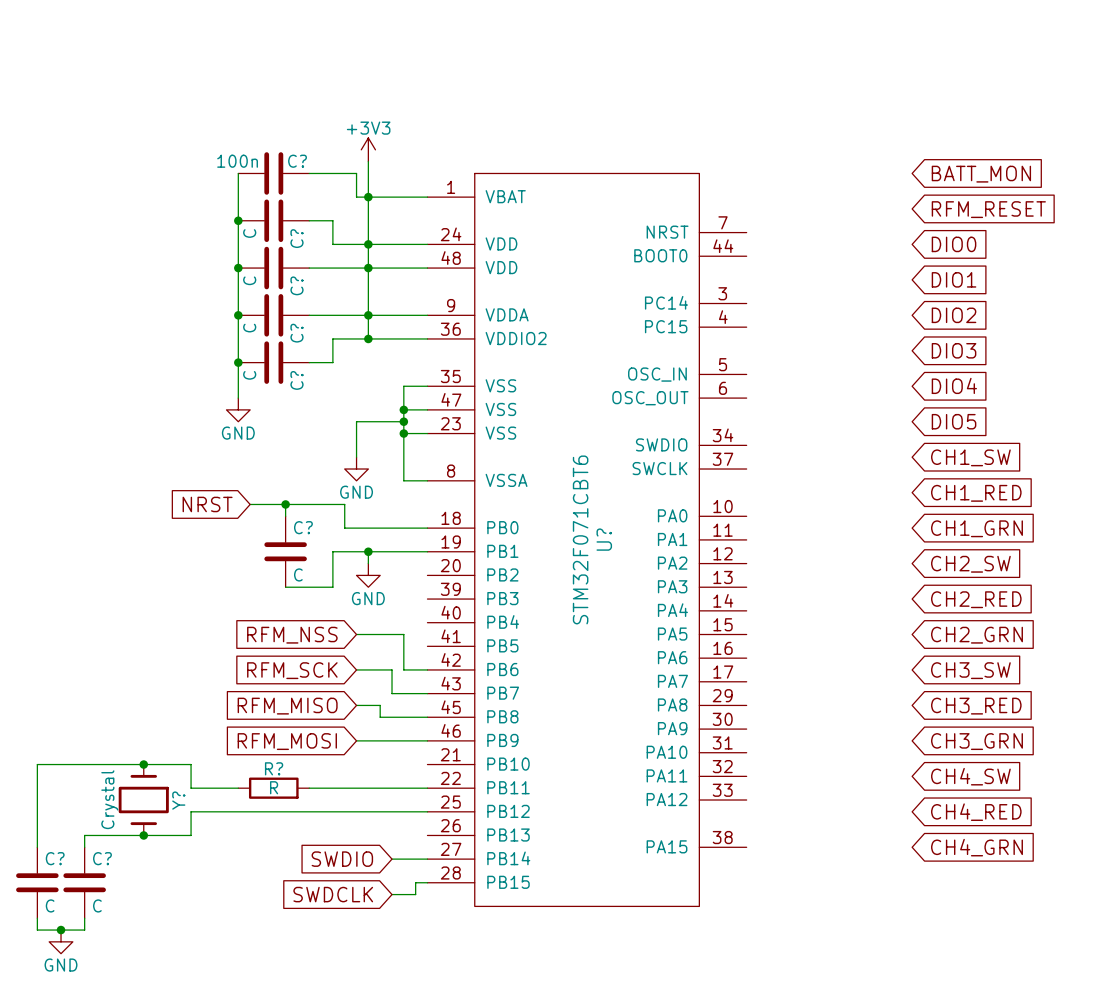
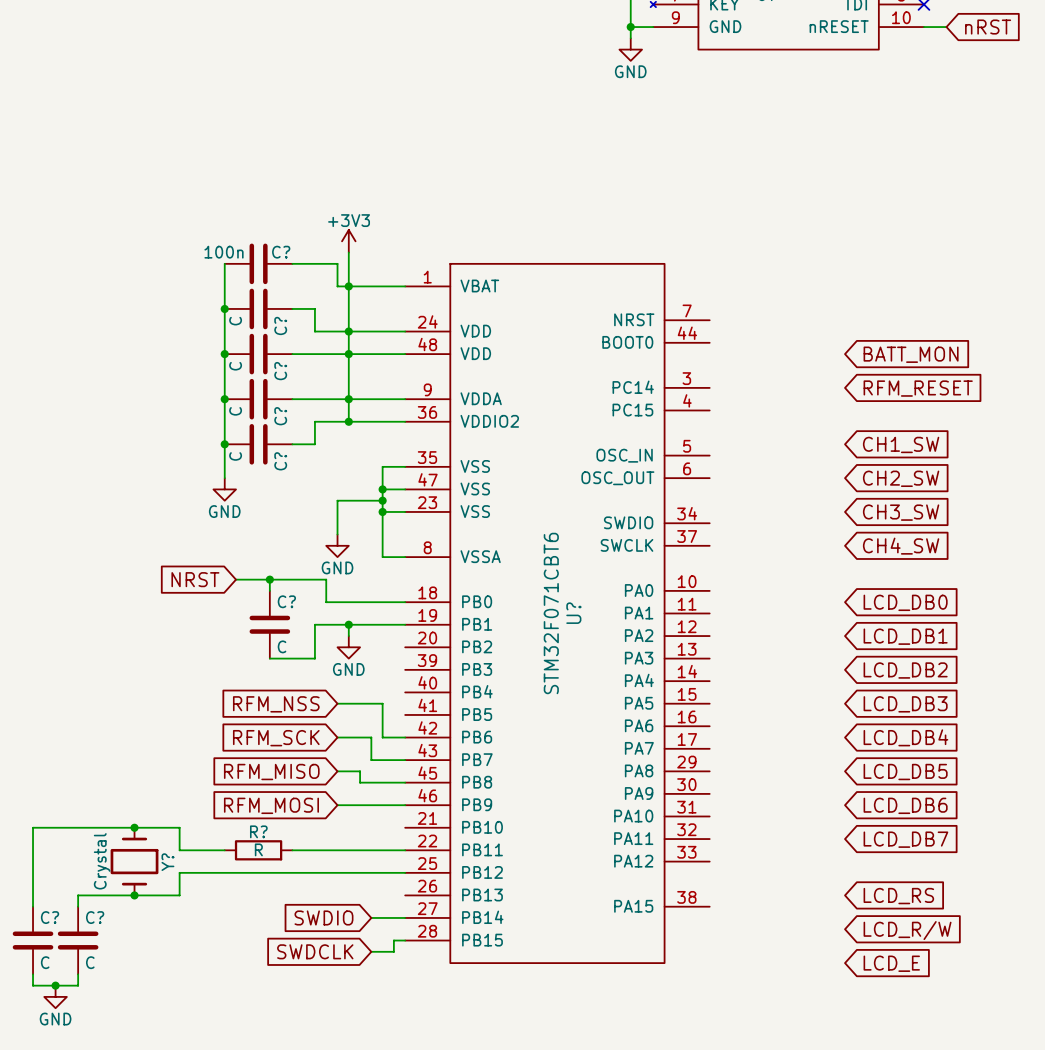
global label position: BATT_MON (981, 174) -> BATT_MON (911, 354)
global label position: RFM_RESET (988, 209) -> RFM_RESET (918, 388)
global label: DIO0 (954, 244) -> none
global label: DIO1 (954, 279) -> none
global label: DIO2 (954, 315) -> none
global label: DIO3 (954, 350) -> none
global label: DIO4 (954, 385) -> none
global label: DIO5 (954, 421) -> none
global label: none -> CH3_SW (901, 512)
global label position: CH1_SW (970, 457) -> CH1_SW (901, 444)
global label: none -> CH4_SW (901, 546)
global label: CH1_RED (976, 493) -> none
global label: none -> LCD_DB0 (905, 602)
global label: CH1_GRN (976, 528) -> none
global label: none -> LCD_DB1 (905, 636)
global label position: CH2_SW (970, 564) -> CH2_SW (901, 478)
global label: none -> LCD_DB2 (905, 670)
global label: CH2_RED (976, 599) -> none
global label: none -> LCD_DB3 (905, 704)
global label: CH2_GRN (976, 635) -> none
global label: none -> LCD_DB4 (905, 737)
global label: CH3_SW (970, 670) -> none
global label: none -> LCD_DB5 (905, 772)
global label: CH3_RED (976, 706) -> none
global label: none -> LCD_DB6 (905, 805)
global label: CH3_GRN (976, 741) -> none
global label: CH4_SW (970, 776) -> none
global label: none -> LCD_DB7 (905, 839)
global label: CH4_RED (976, 812) -> none
global label: none -> LCD_RS (898, 896)
global label: CH4_GRN (976, 847) -> none
global label: none -> LCD_R/W (907, 930)
global label: none -> LCD_E (891, 963)

